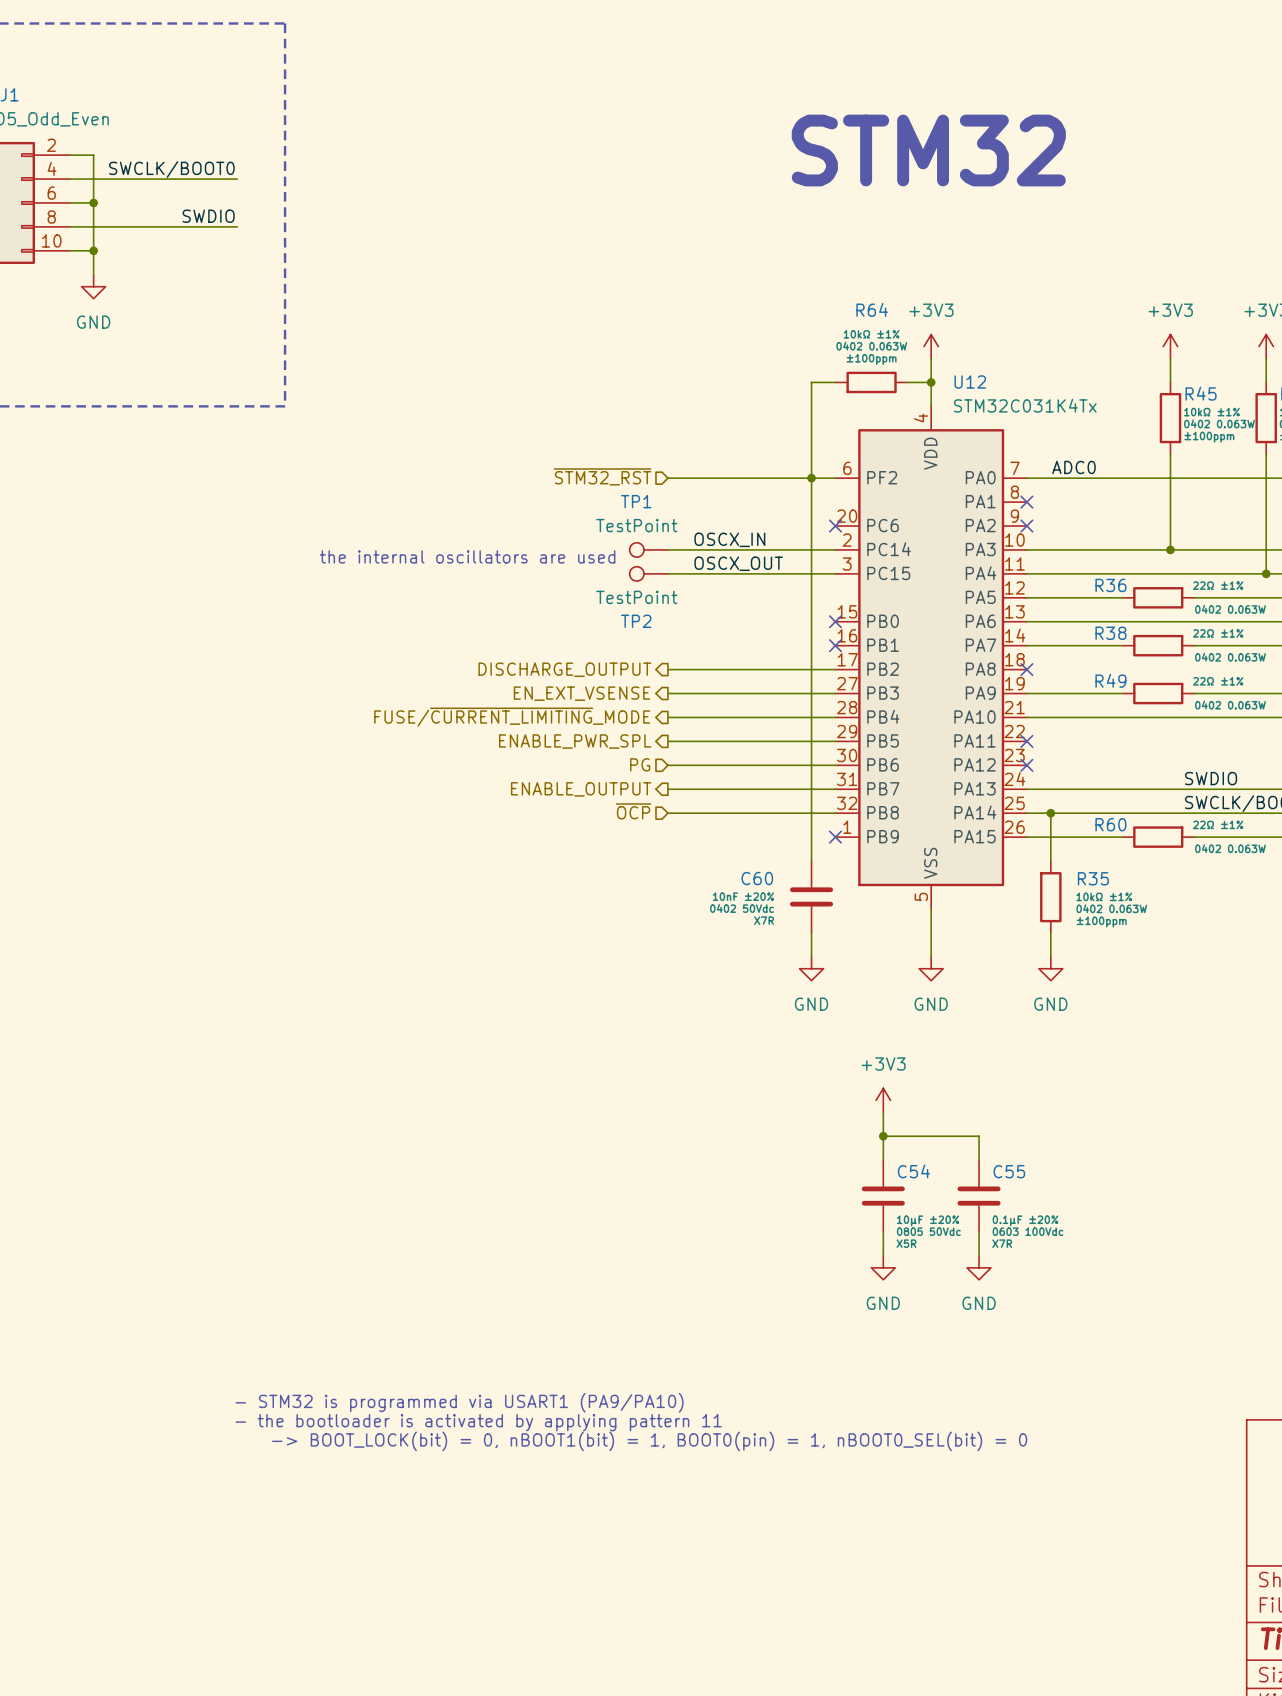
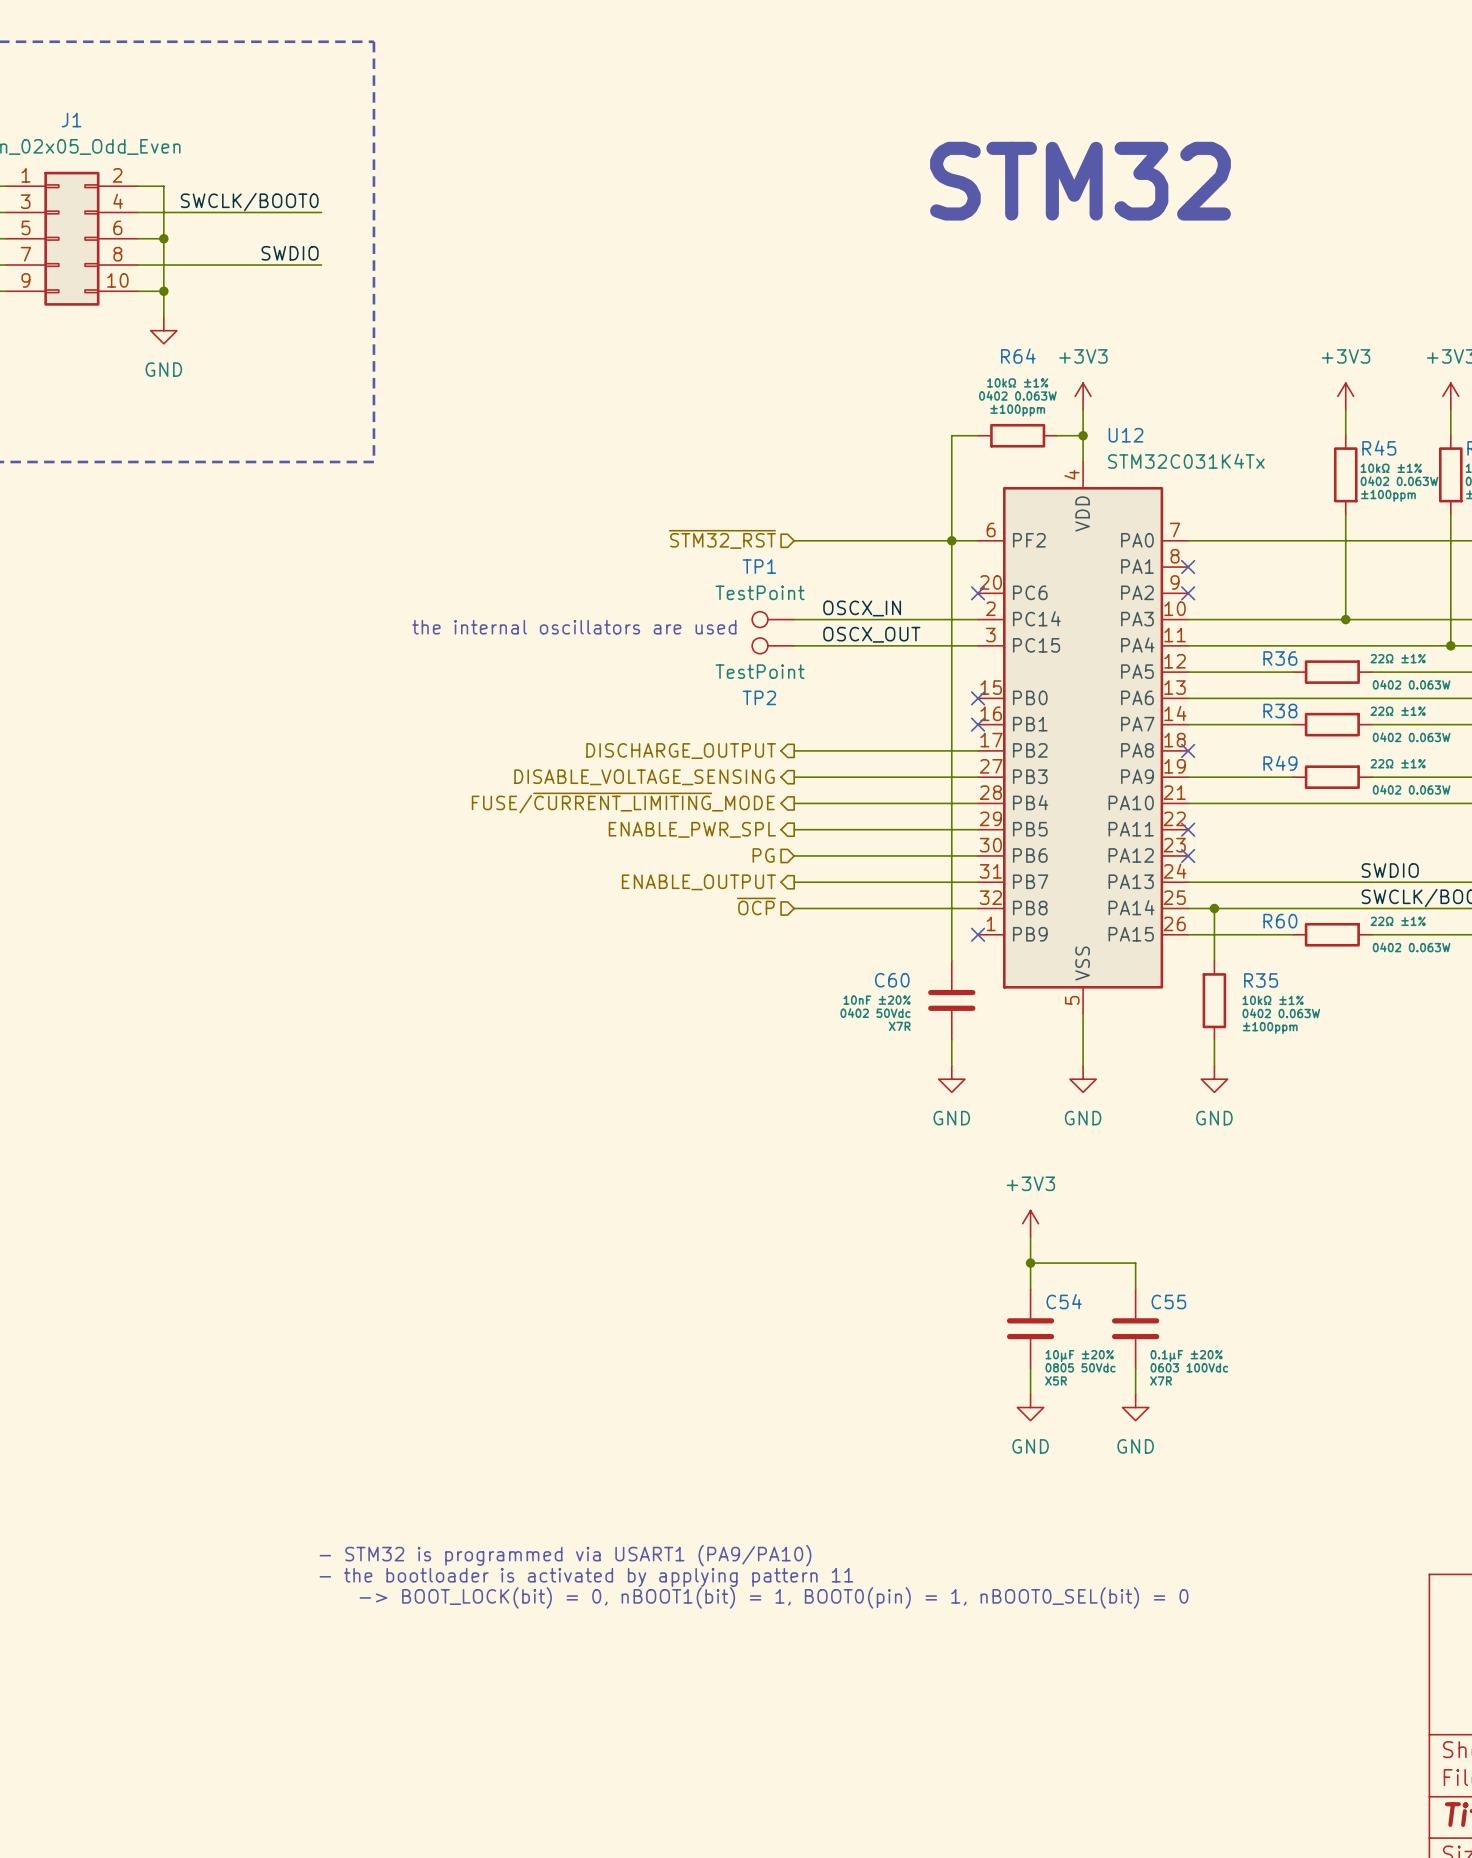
label: ADC0 (1073, 467) -> none
hierarchical label: EN_EXT_VSENSE (582, 693) -> DISABLE_VOLTAGE_SENSING (644, 777)

